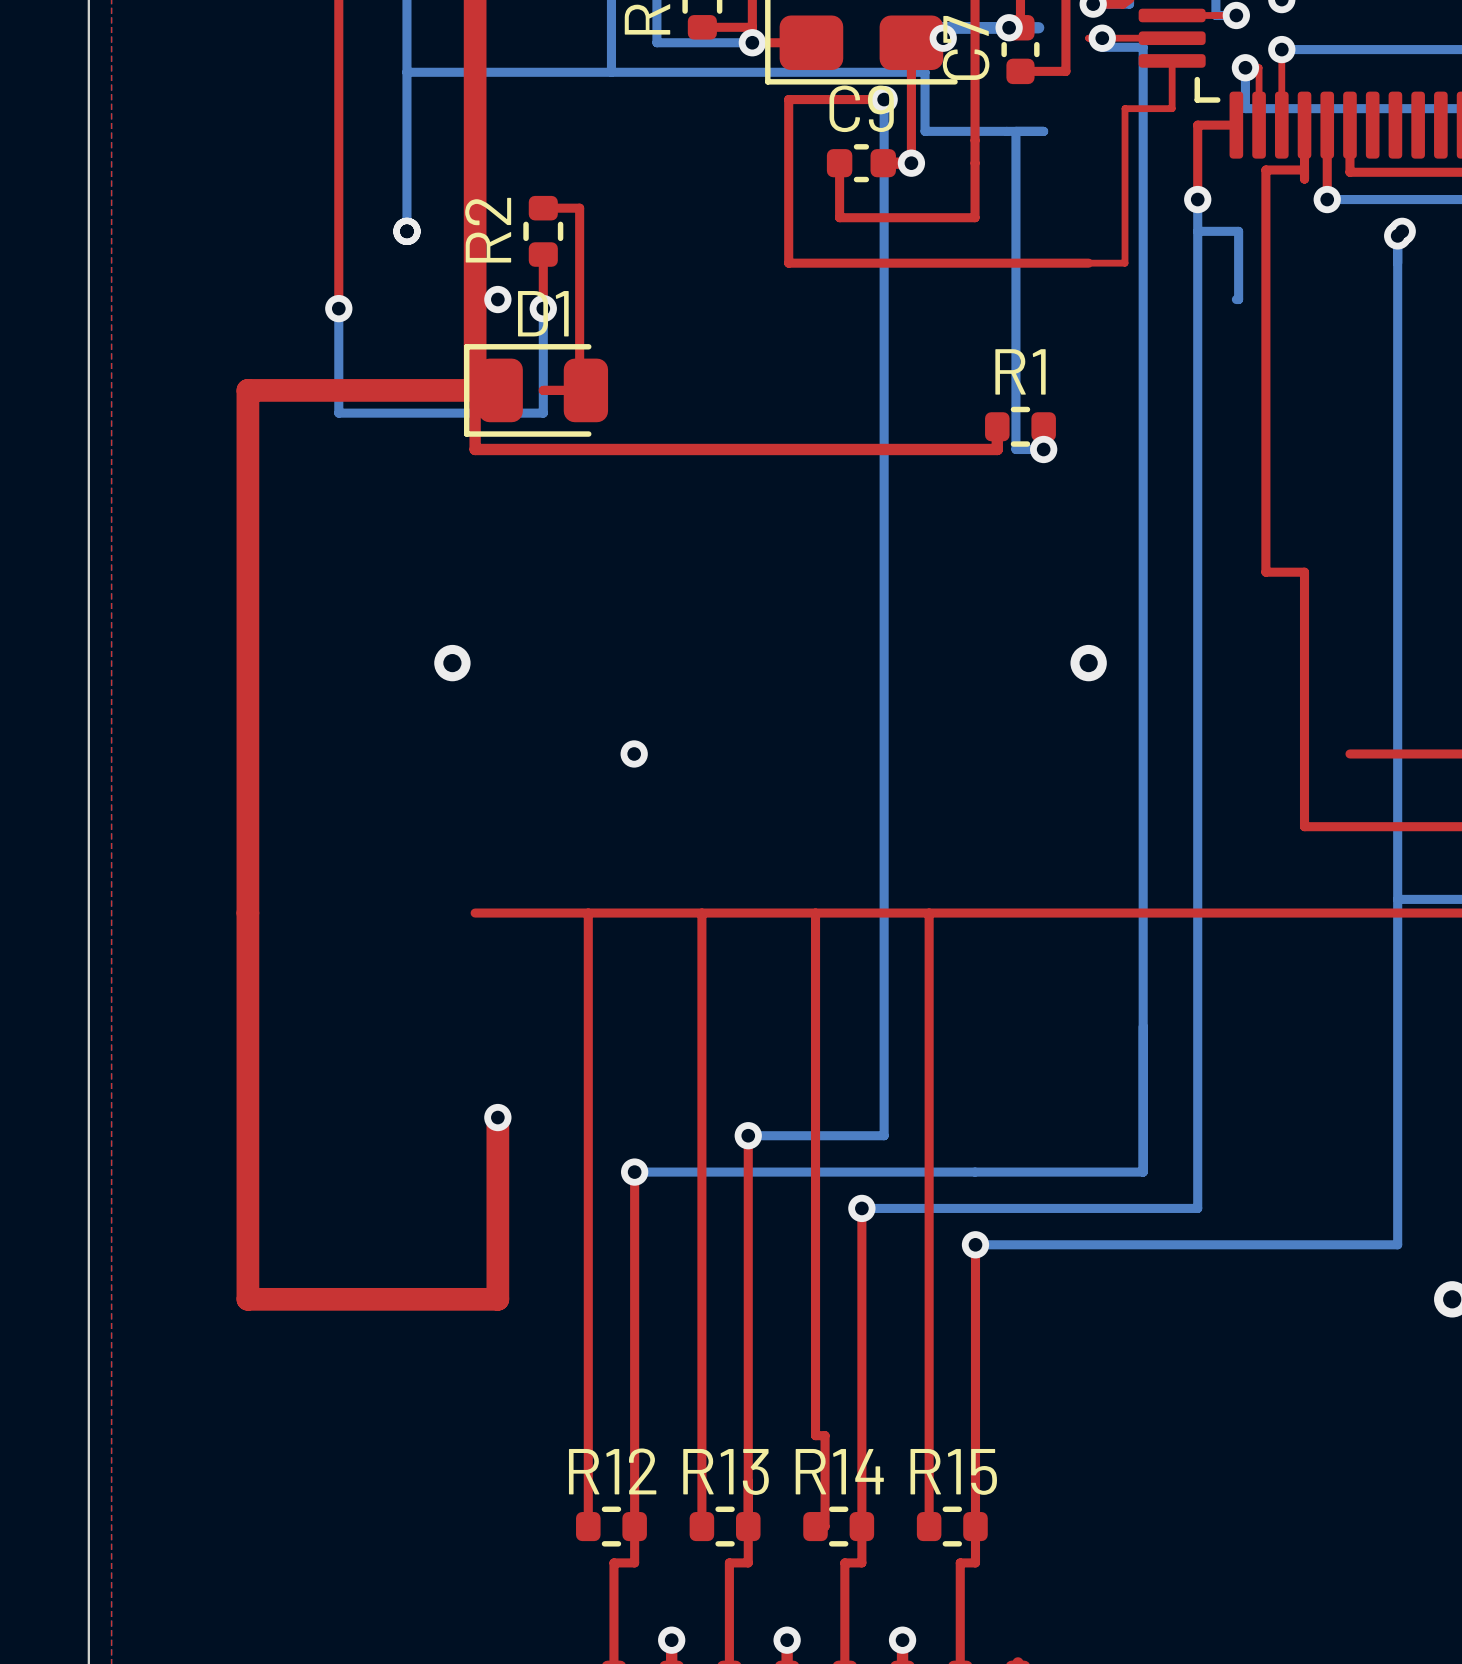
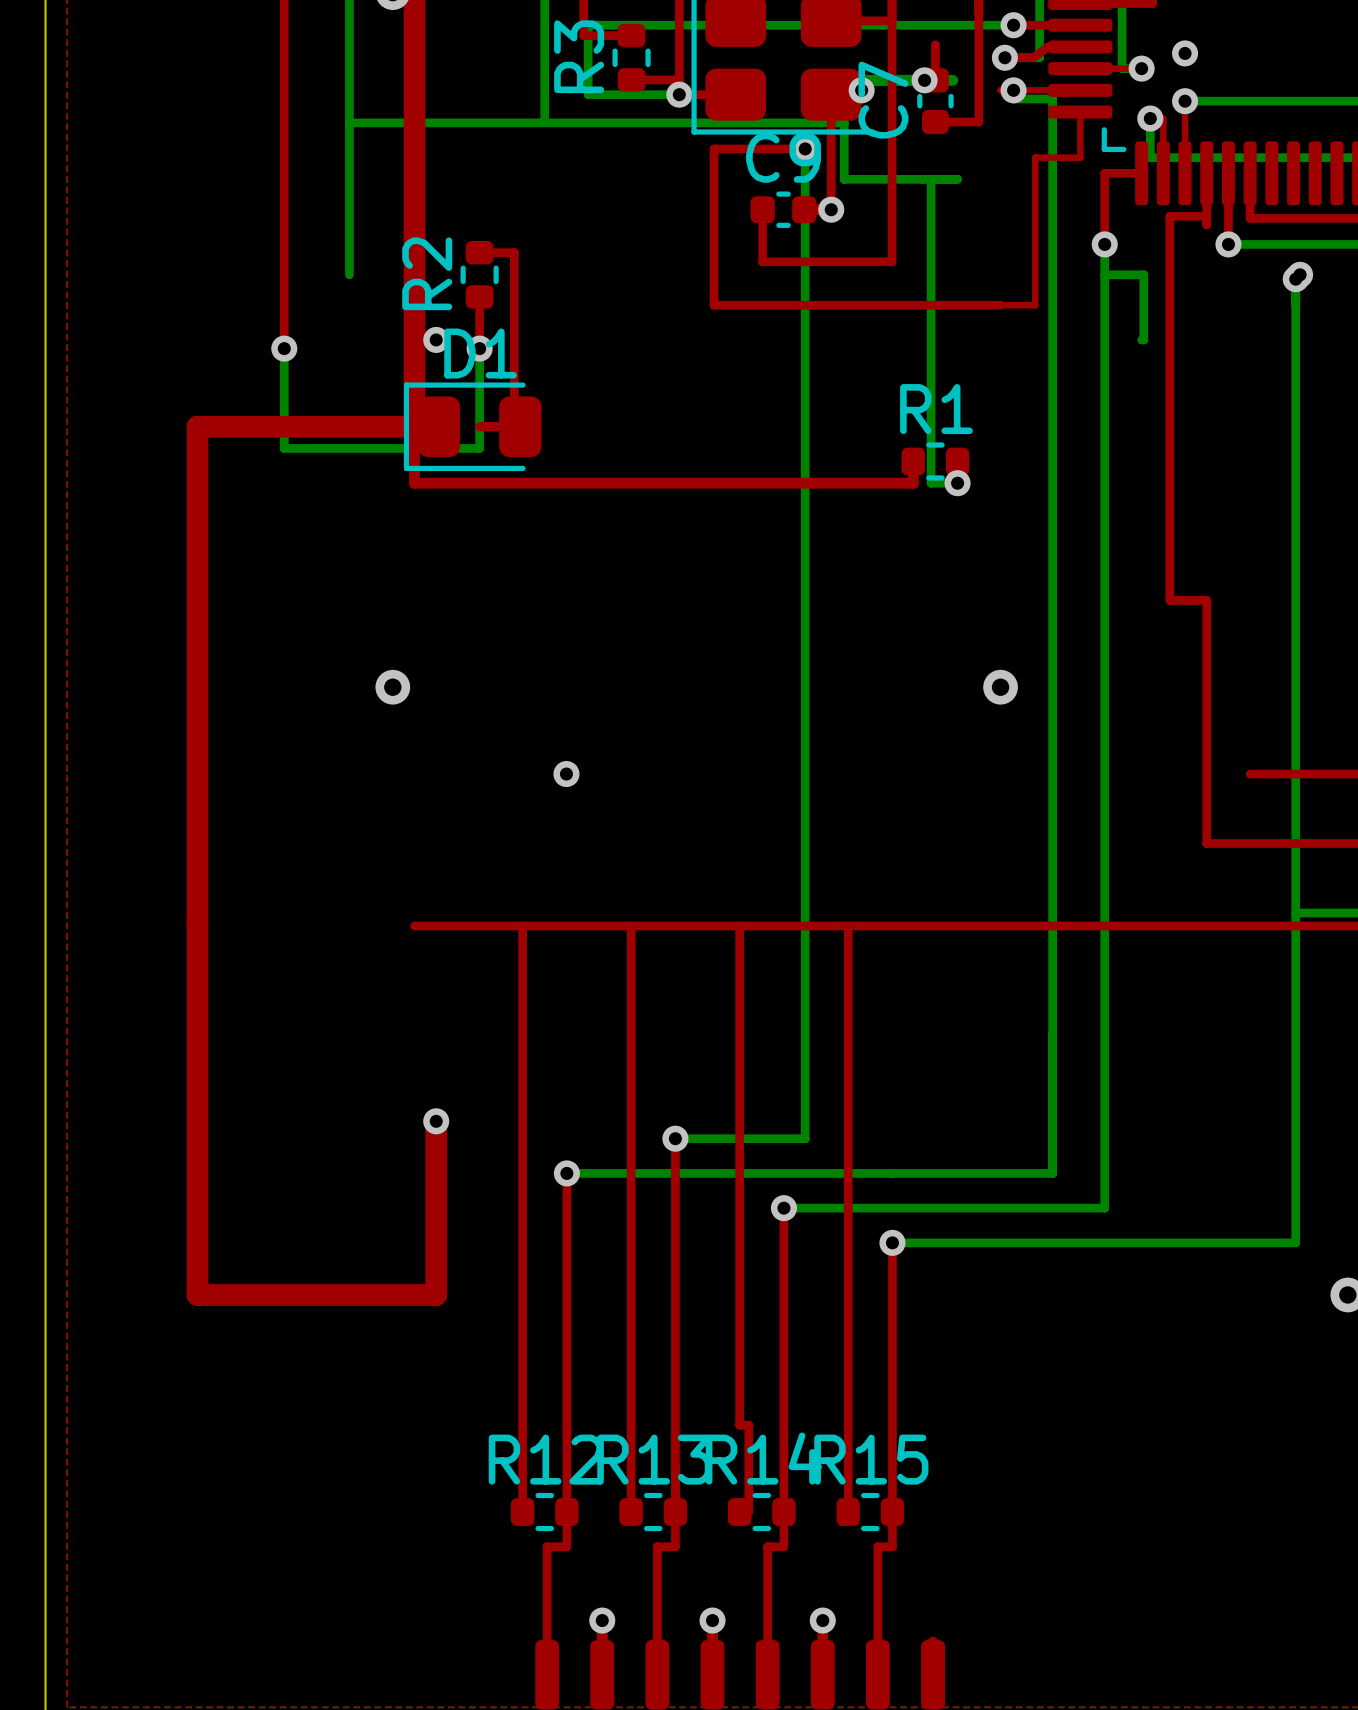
via: (406, 231) -> none

